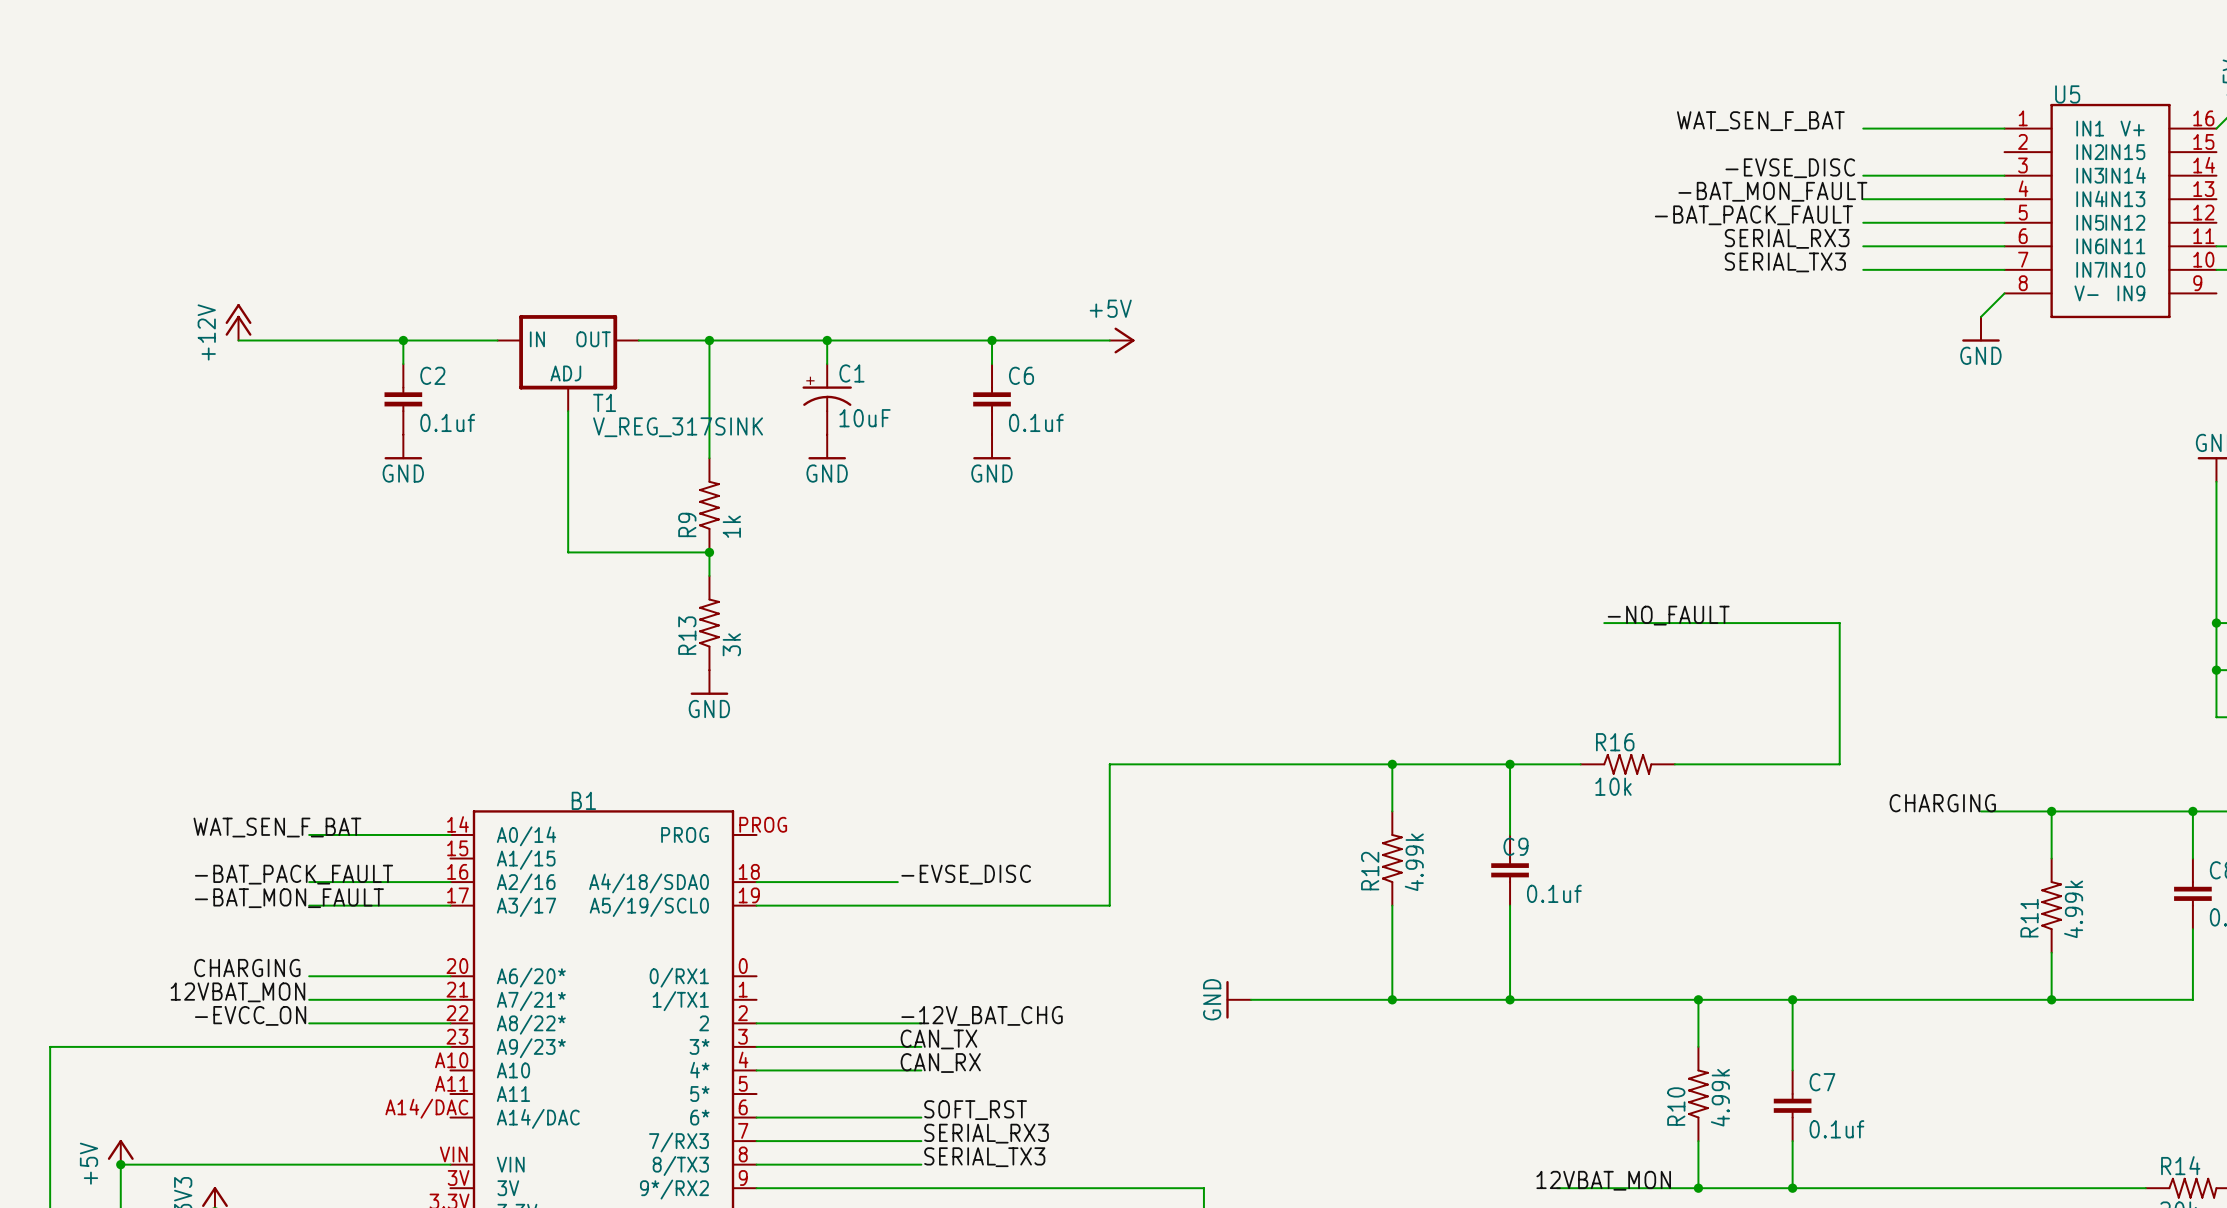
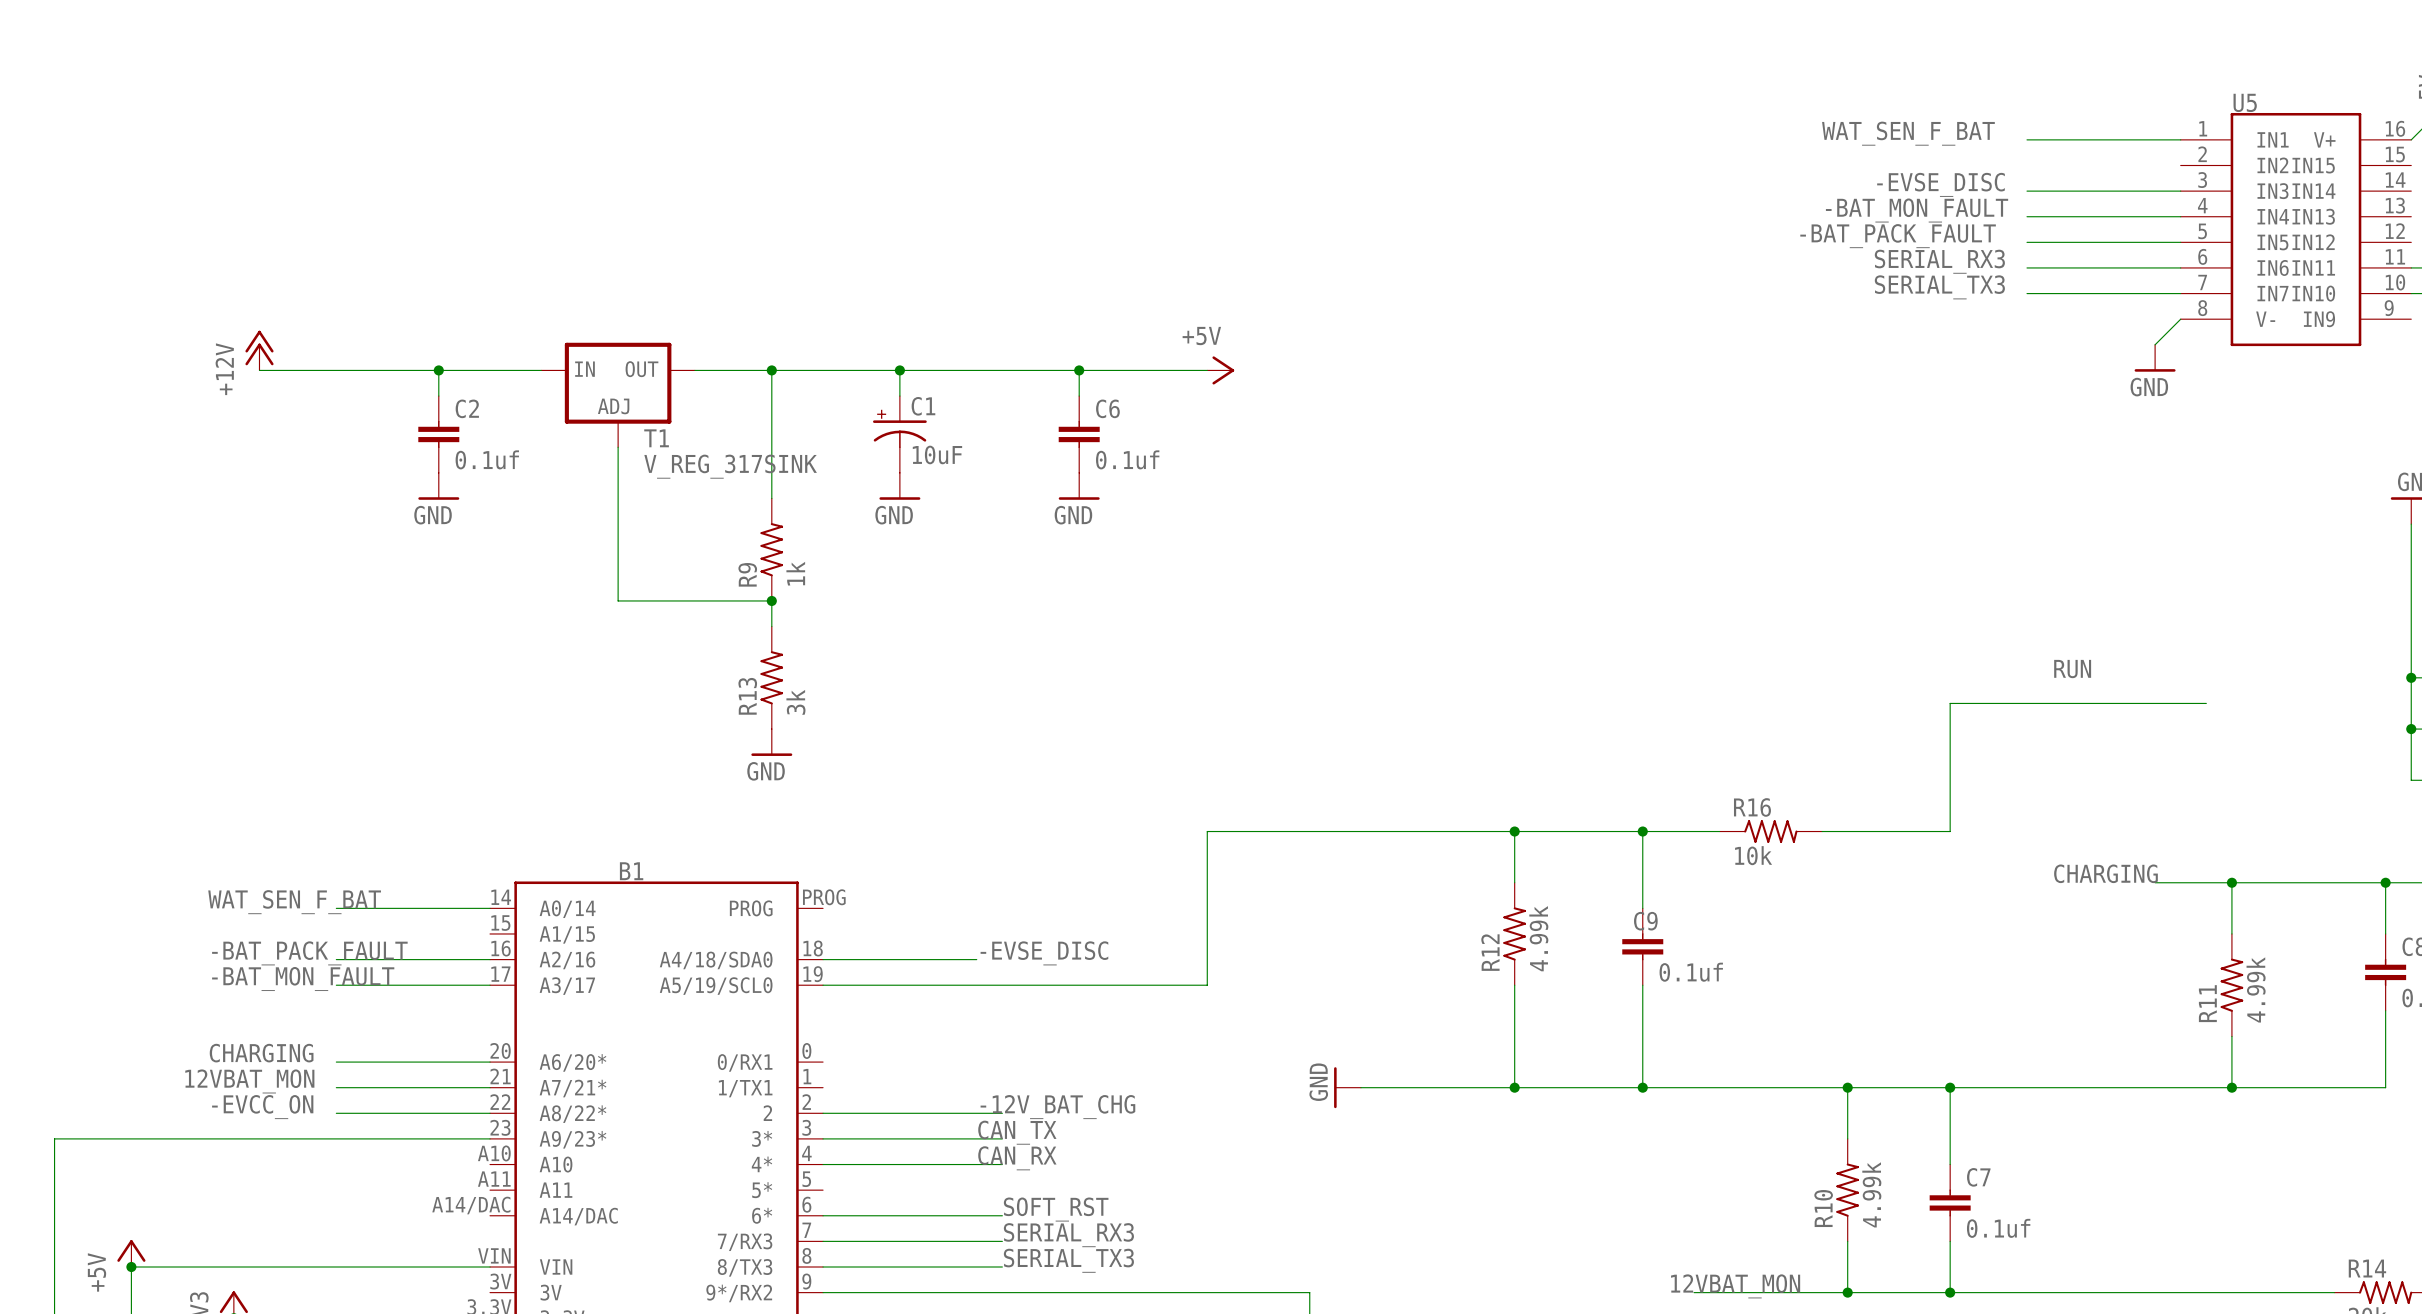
label: none -> RUN (2072, 669)
label: -NO_FAULT (1668, 615) -> none
wire: (1604, 623) (1839, 623) (1839, 764) (1792, 764) -> (2206, 703) (1950, 703) (1950, 831)

